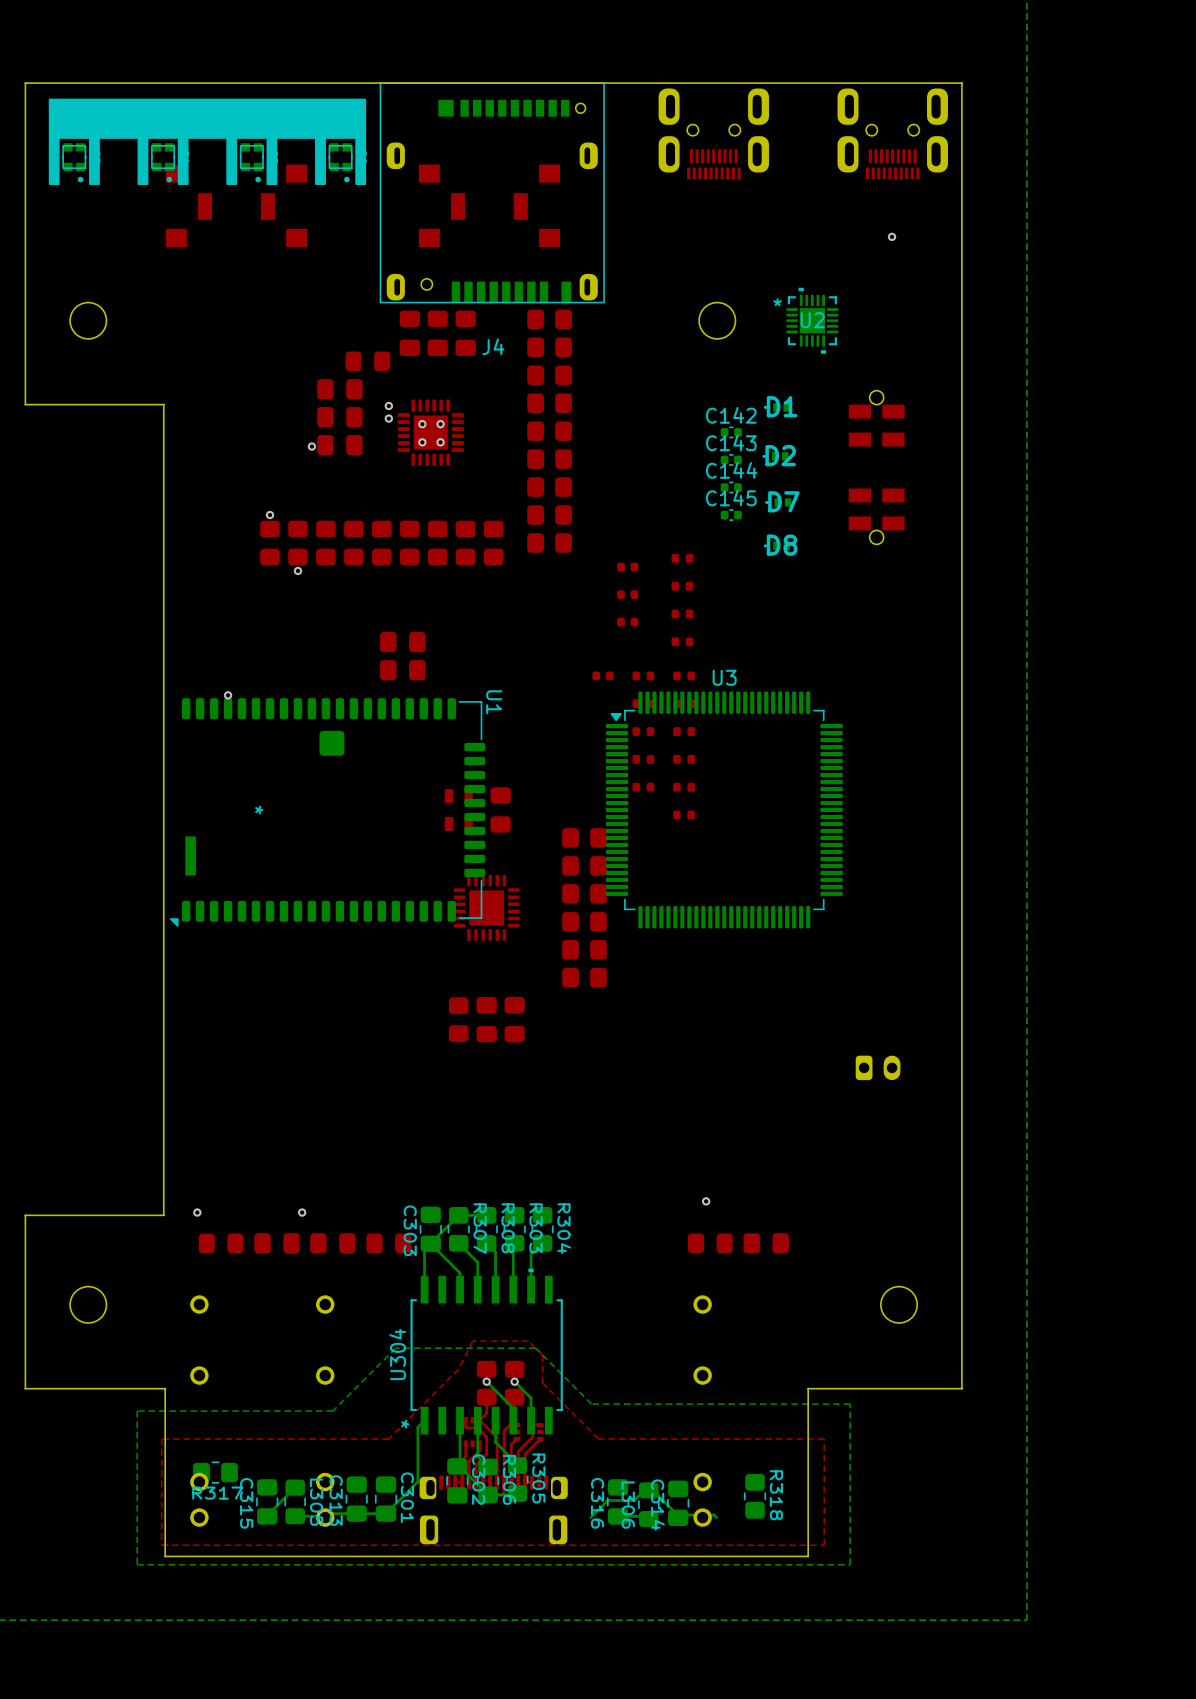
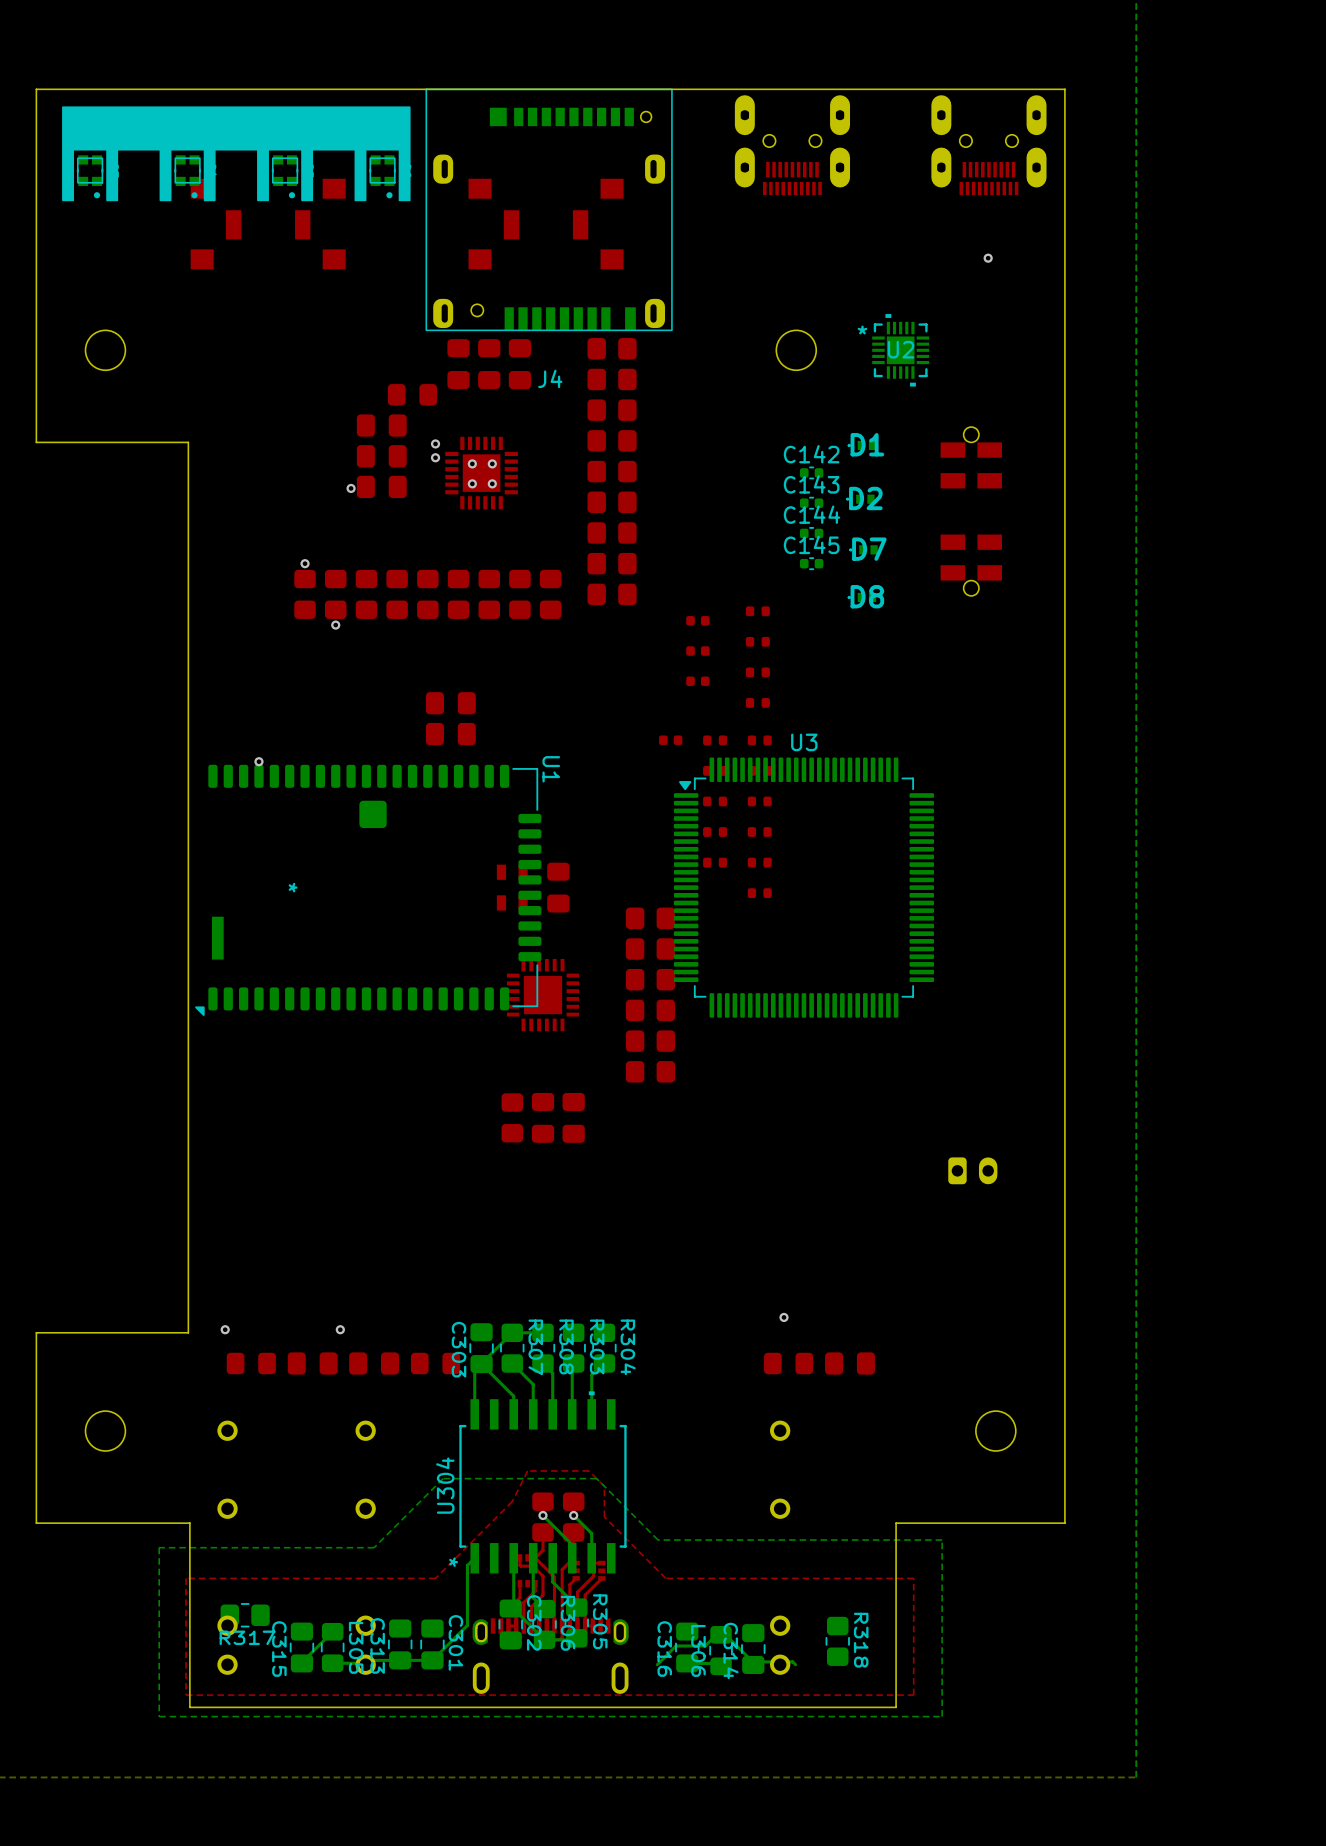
part footprint: [658, 88, 770, 180] -> [734, 95, 851, 196]
part footprint: [837, 88, 948, 180] -> [931, 95, 1047, 196]
part footprint: [419, 1475, 568, 1545] -> [472, 1618, 629, 1694]

